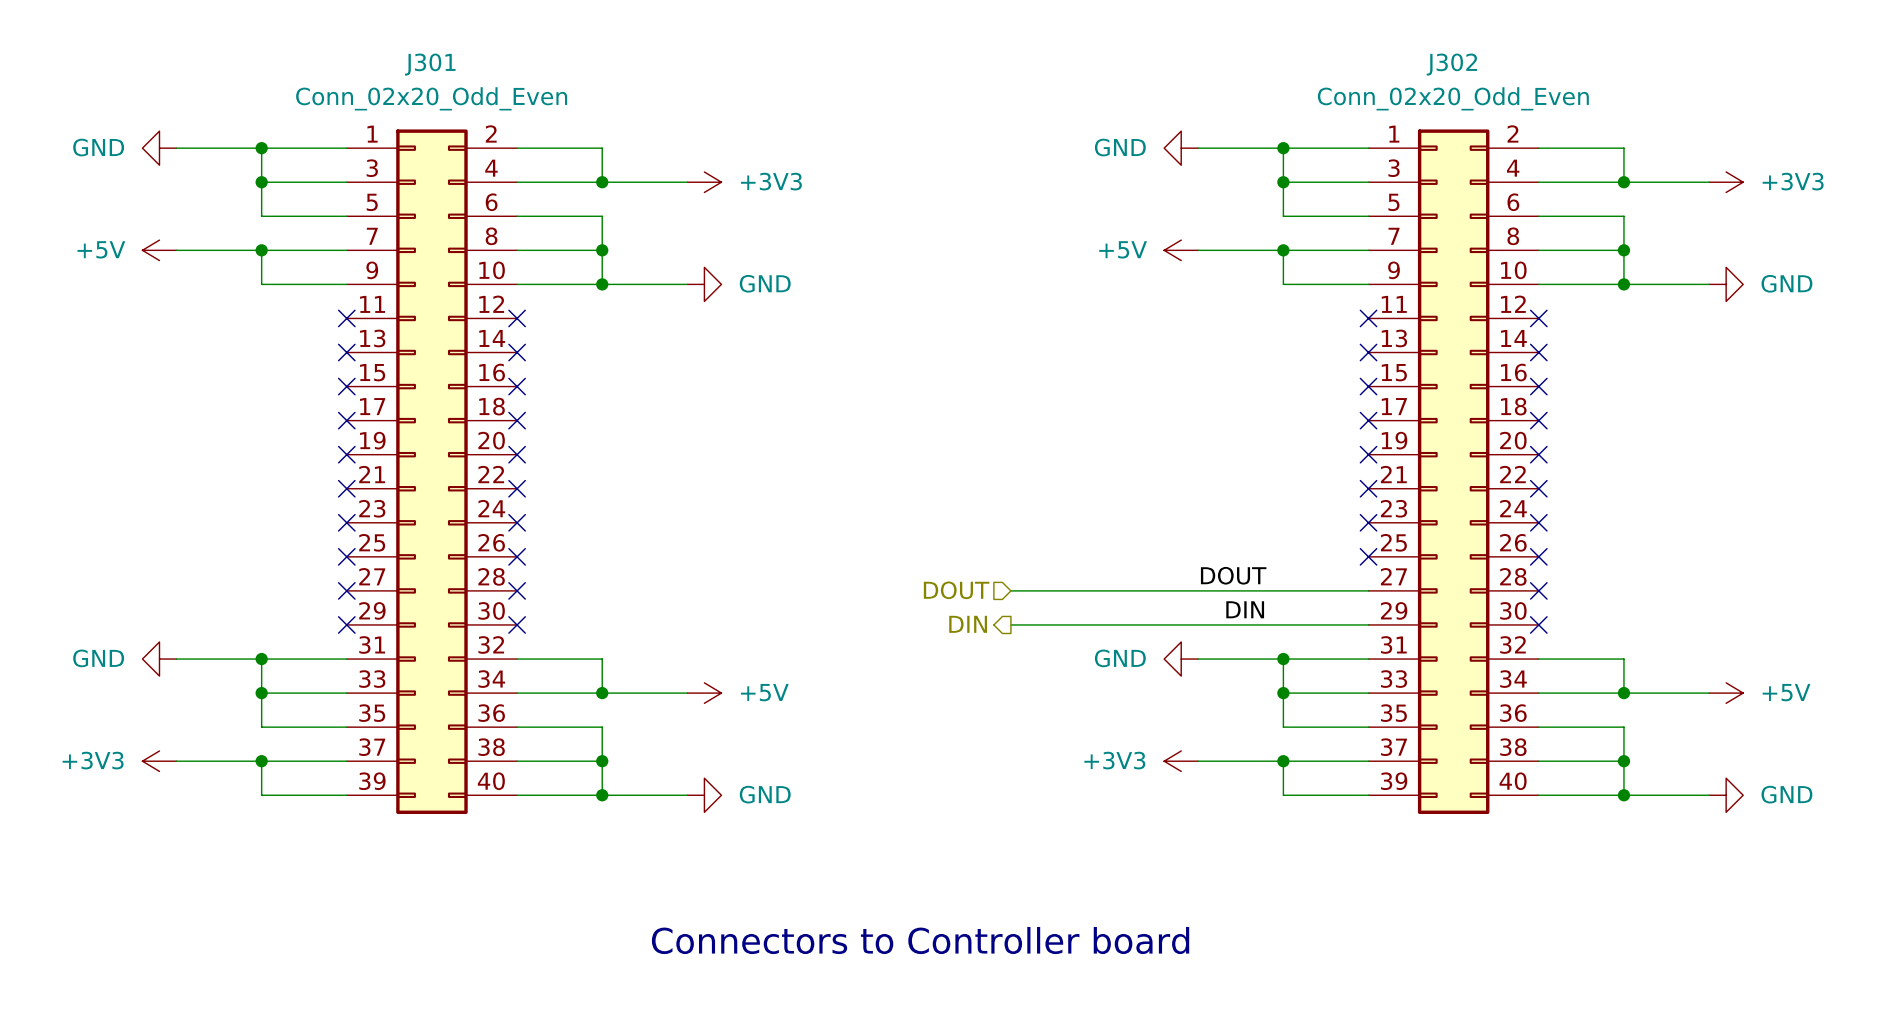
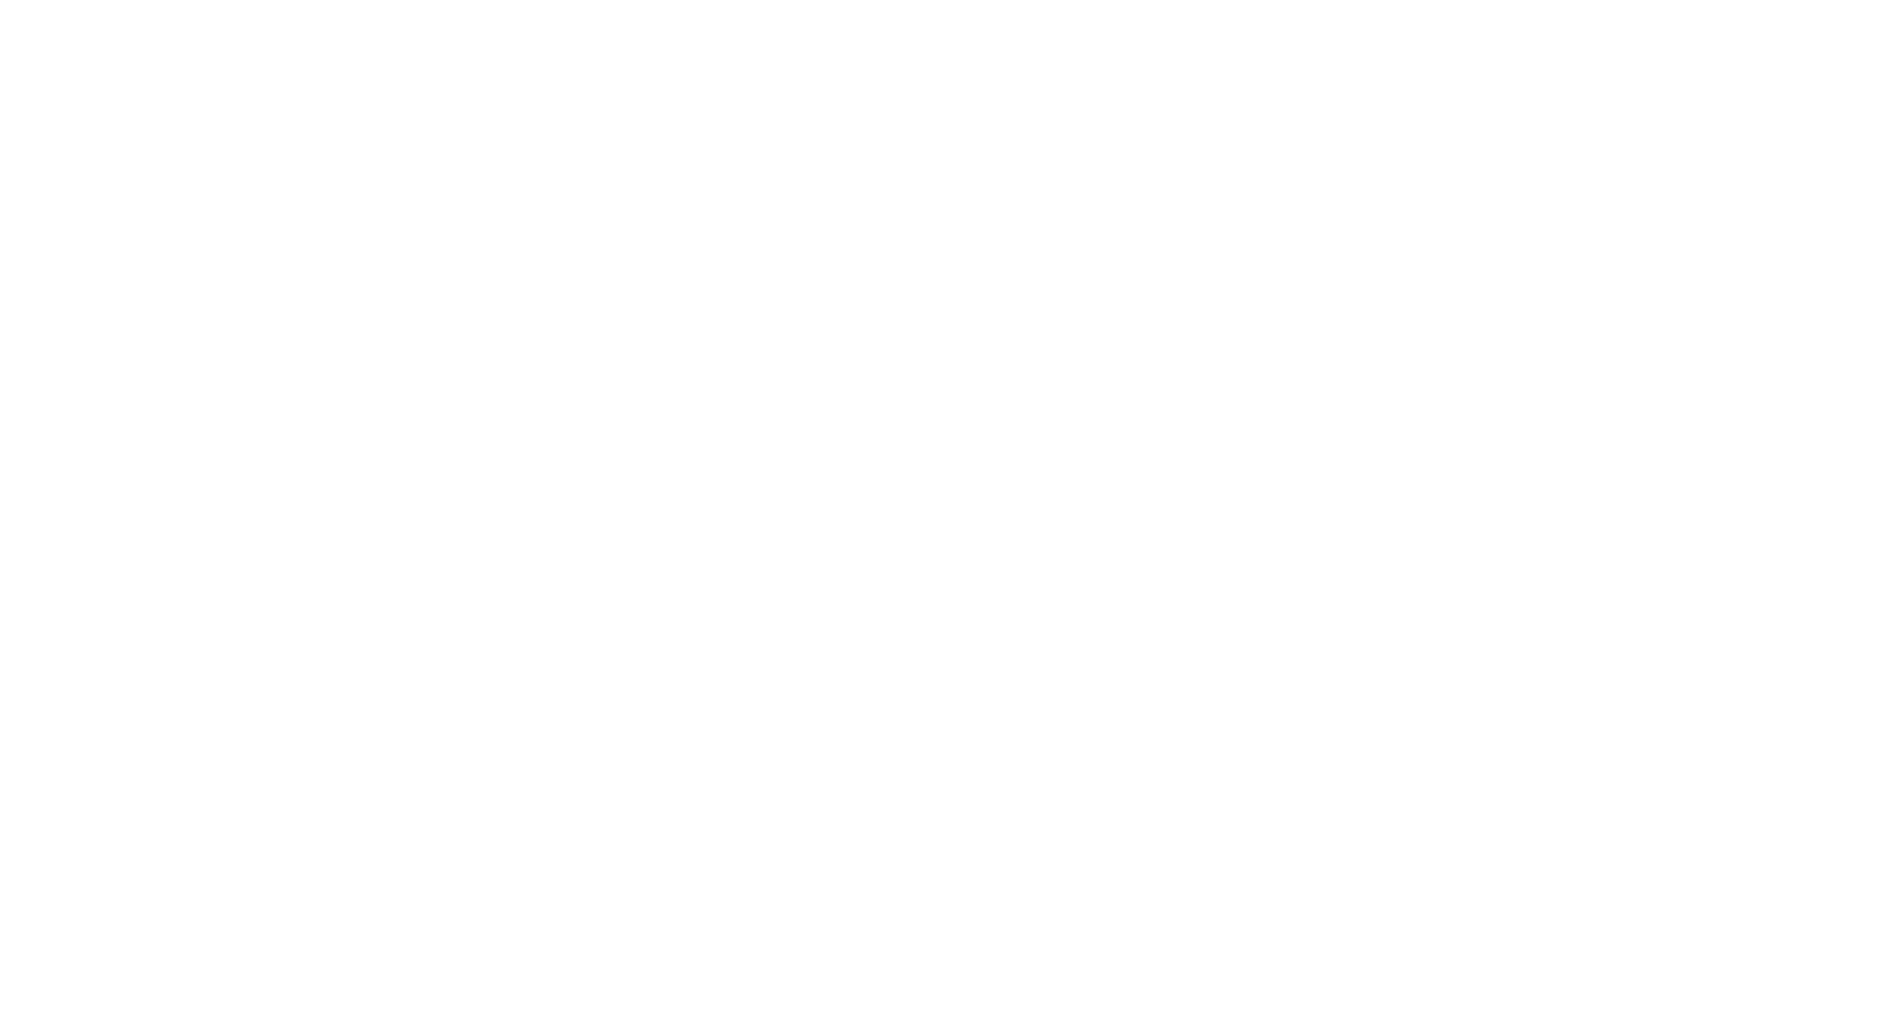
power symbol: GND (159, 148) -> none
wire: (176, 148) (346, 148) -> none
wire: (261, 148) (261, 216) (346, 216) -> none
junction: (261, 148) -> none
wire: (517, 148) (602, 148) (602, 182) -> none
power symbol: GND (1181, 148) -> none
wire: (1198, 148) (1368, 148) -> none
wire: (1283, 148) (1283, 216) (1368, 216) -> none
junction: (1283, 148) -> none
wire: (1538, 148) (1623, 148) (1623, 182) -> none
wire: (261, 182) (346, 182) -> none
junction: (261, 182) -> none
wire: (517, 182) (687, 182) -> none
junction: (602, 182) -> none
power symbol: +3V3 (704, 182) -> none
wire: (1283, 182) (1368, 182) -> none
junction: (1283, 182) -> none
wire: (1538, 182) (1709, 182) -> none
junction: (1623, 182) -> none
power symbol: +3V3 (1726, 182) -> none
wire: (517, 216) (602, 216) (602, 284) -> none
wire: (1538, 216) (1623, 216) (1623, 284) -> none
power symbol: +5V (159, 250) -> none
wire: (176, 250) (346, 250) -> none
wire: (261, 250) (261, 284) (346, 284) -> none
junction: (261, 250) -> none
wire: (517, 250) (602, 250) -> none
junction: (602, 250) -> none
power symbol: +5V (1181, 250) -> none
wire: (1198, 250) (1368, 250) -> none
wire: (1283, 250) (1283, 284) (1368, 284) -> none
junction: (1283, 250) -> none
wire: (1538, 250) (1623, 250) -> none
junction: (1623, 250) -> none
wire: (517, 284) (687, 284) -> none
junction: (602, 284) -> none
power symbol: GND (704, 284) -> none
wire: (1538, 284) (1709, 284) -> none
junction: (1623, 284) -> none
power symbol: GND (1726, 284) -> none
no-connect mark: (346, 318) -> none
no-connect mark: (517, 318) -> none
no-connect mark: (1368, 318) -> none
no-connect mark: (1538, 318) -> none
no-connect mark: (346, 352) -> none
no-connect mark: (517, 352) -> none
no-connect mark: (1368, 352) -> none
no-connect mark: (1538, 352) -> none
no-connect mark: (346, 386) -> none
no-connect mark: (517, 386) -> none
no-connect mark: (1368, 386) -> none
no-connect mark: (1538, 386) -> none
no-connect mark: (346, 420) -> none
no-connect mark: (517, 420) -> none
no-connect mark: (1368, 420) -> none
no-connect mark: (1538, 420) -> none
no-connect mark: (346, 454) -> none
no-connect mark: (517, 454) -> none
no-connect mark: (1368, 454) -> none
no-connect mark: (1538, 454) -> none
J301: Conn_02x20_Odd_Even (431, 471) -> none
J302: Conn_02x20_Odd_Even (1453, 471) -> none
no-connect mark: (346, 488) -> none
no-connect mark: (517, 488) -> none
no-connect mark: (1368, 488) -> none
no-connect mark: (1538, 488) -> none
no-connect mark: (346, 522) -> none
no-connect mark: (517, 522) -> none
no-connect mark: (1368, 522) -> none
no-connect mark: (1538, 522) -> none
no-connect mark: (346, 556) -> none
no-connect mark: (517, 556) -> none
no-connect mark: (1368, 556) -> none
no-connect mark: (1538, 556) -> none
label: DOUT (1233, 575) -> none
no-connect mark: (346, 590) -> none
no-connect mark: (517, 590) -> none
hierarchical label: DOUT (956, 590) -> none
wire: (1010, 590) (1368, 590) -> none
no-connect mark: (1538, 590) -> none
label: DIN (1245, 609) -> none
no-connect mark: (346, 624) -> none
no-connect mark: (517, 624) -> none
hierarchical label: DIN (968, 624) -> none
wire: (1010, 624) (1368, 624) -> none
no-connect mark: (1538, 624) -> none
power symbol: GND (159, 659) -> none
wire: (176, 659) (346, 659) -> none
wire: (261, 659) (261, 727) (346, 727) -> none
junction: (261, 659) -> none
wire: (517, 659) (602, 659) (602, 693) -> none
power symbol: GND (1181, 659) -> none
wire: (1198, 659) (1368, 659) -> none
wire: (1283, 659) (1283, 727) (1368, 727) -> none
junction: (1283, 659) -> none
wire: (1538, 659) (1623, 659) (1623, 693) -> none
wire: (261, 693) (346, 693) -> none
junction: (261, 693) -> none
wire: (517, 693) (687, 693) -> none
junction: (602, 693) -> none
power symbol: +5V (704, 693) -> none
wire: (1283, 693) (1368, 693) -> none
junction: (1283, 693) -> none
wire: (1538, 693) (1709, 693) -> none
junction: (1623, 693) -> none
power symbol: +5V (1726, 693) -> none
wire: (517, 727) (602, 727) (602, 795) -> none
wire: (1538, 727) (1623, 727) (1623, 795) -> none
power symbol: +3V3 (159, 761) -> none
wire: (176, 761) (346, 761) -> none
wire: (261, 761) (261, 795) (346, 795) -> none
junction: (261, 761) -> none
wire: (517, 761) (602, 761) -> none
junction: (602, 761) -> none
power symbol: +3V3 (1181, 761) -> none
wire: (1198, 761) (1368, 761) -> none
wire: (1283, 761) (1283, 795) (1368, 795) -> none
junction: (1283, 761) -> none
wire: (1538, 761) (1623, 761) -> none
junction: (1623, 761) -> none
wire: (517, 795) (687, 795) -> none
junction: (602, 795) -> none
power symbol: GND (704, 795) -> none
wire: (1538, 795) (1709, 795) -> none
junction: (1623, 795) -> none
power symbol: GND (1726, 795) -> none
text: Connectors to Controller board (920, 940) -> none

